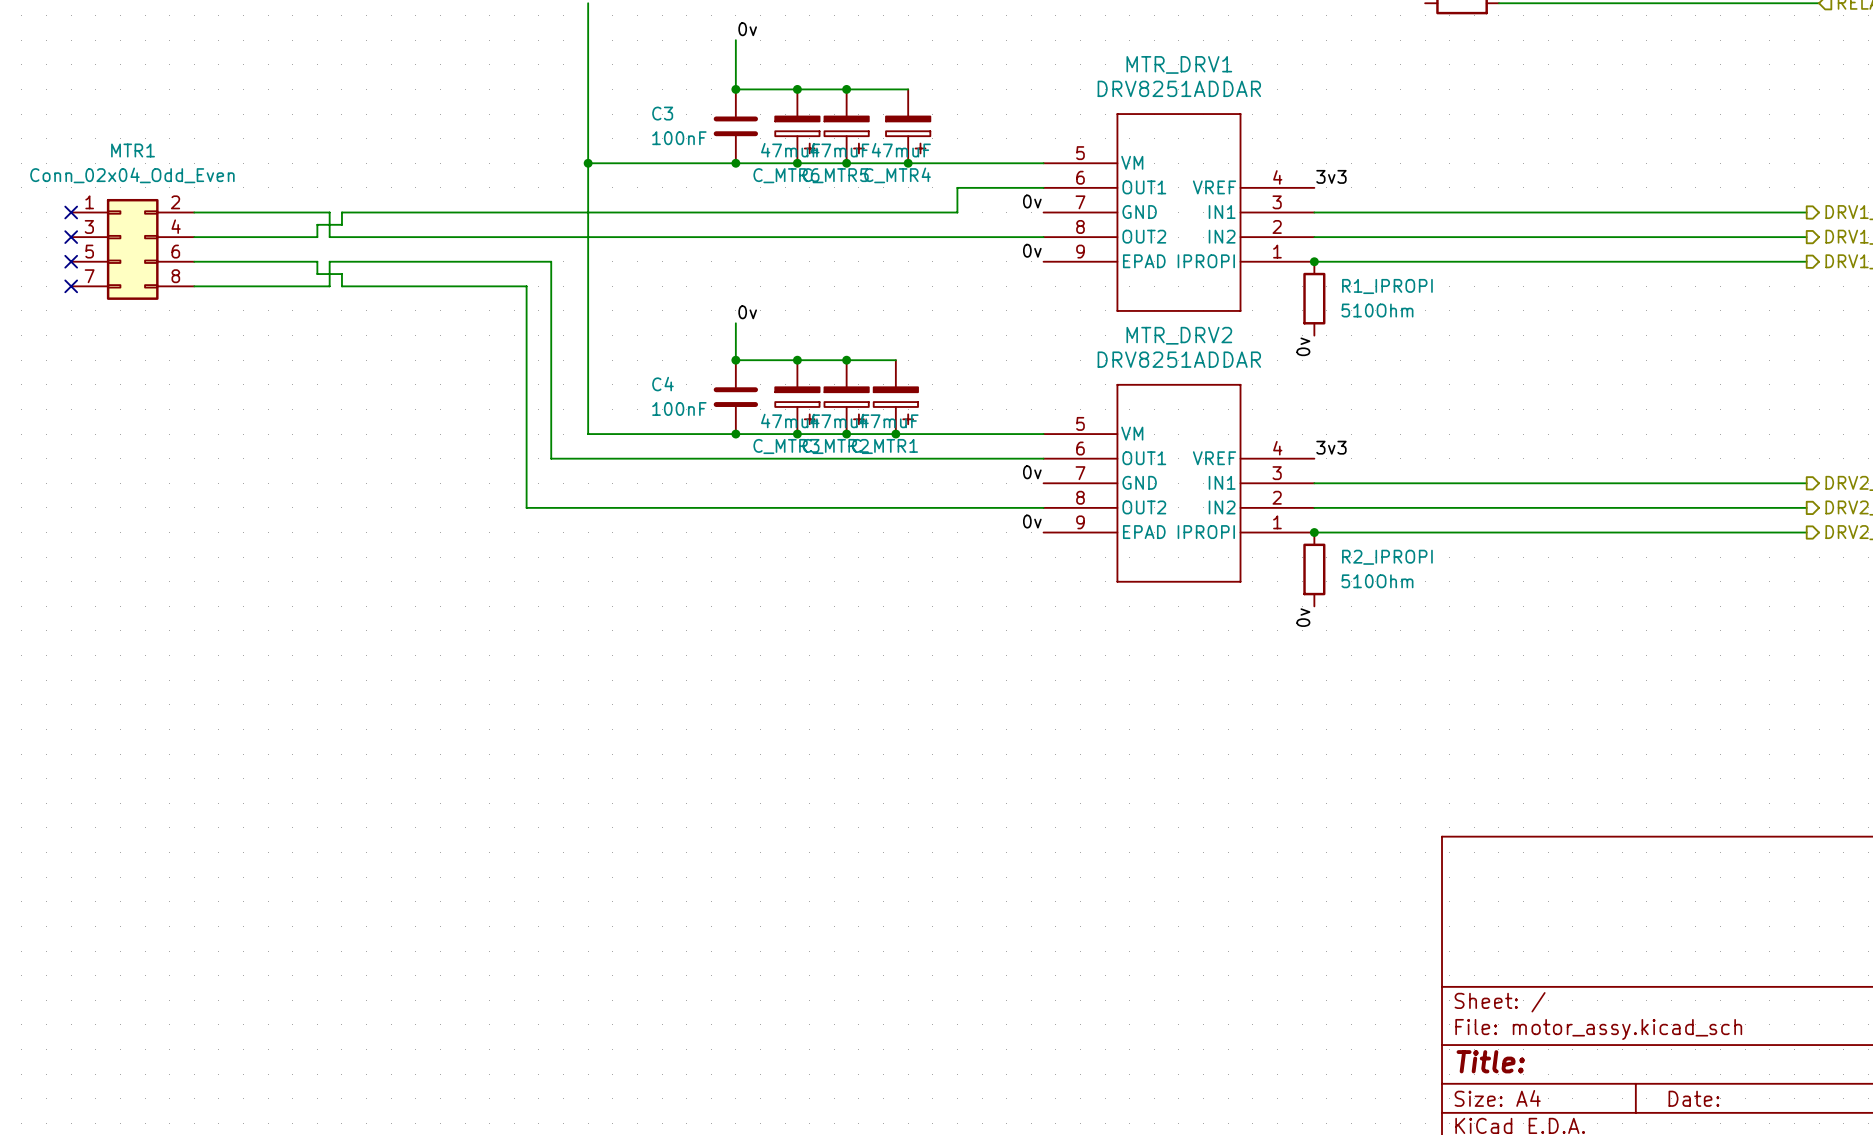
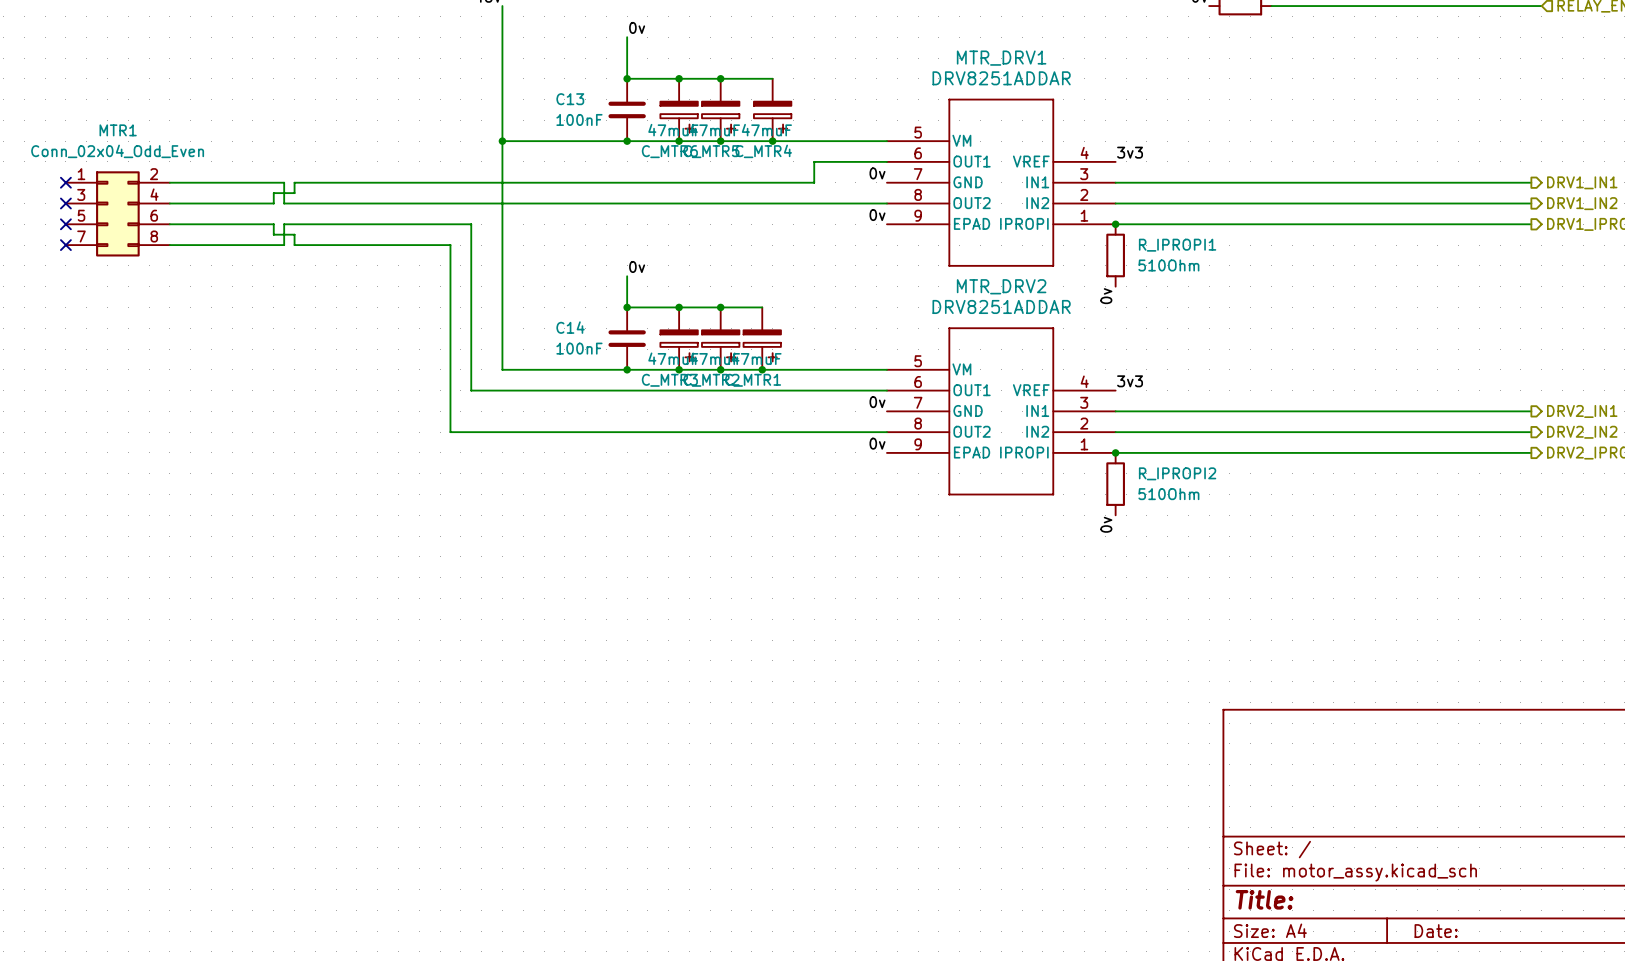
C3 name: C3 (662, 113) -> C13 (570, 99)
R1_IPROPI name: R1_IPROPI (1387, 286) -> R_IPROPI1 (1177, 245)
C4 name: C4 (662, 384) -> C14 (570, 327)
R2_IPROPI name: R2_IPROPI (1387, 557) -> R_IPROPI2 (1177, 473)

